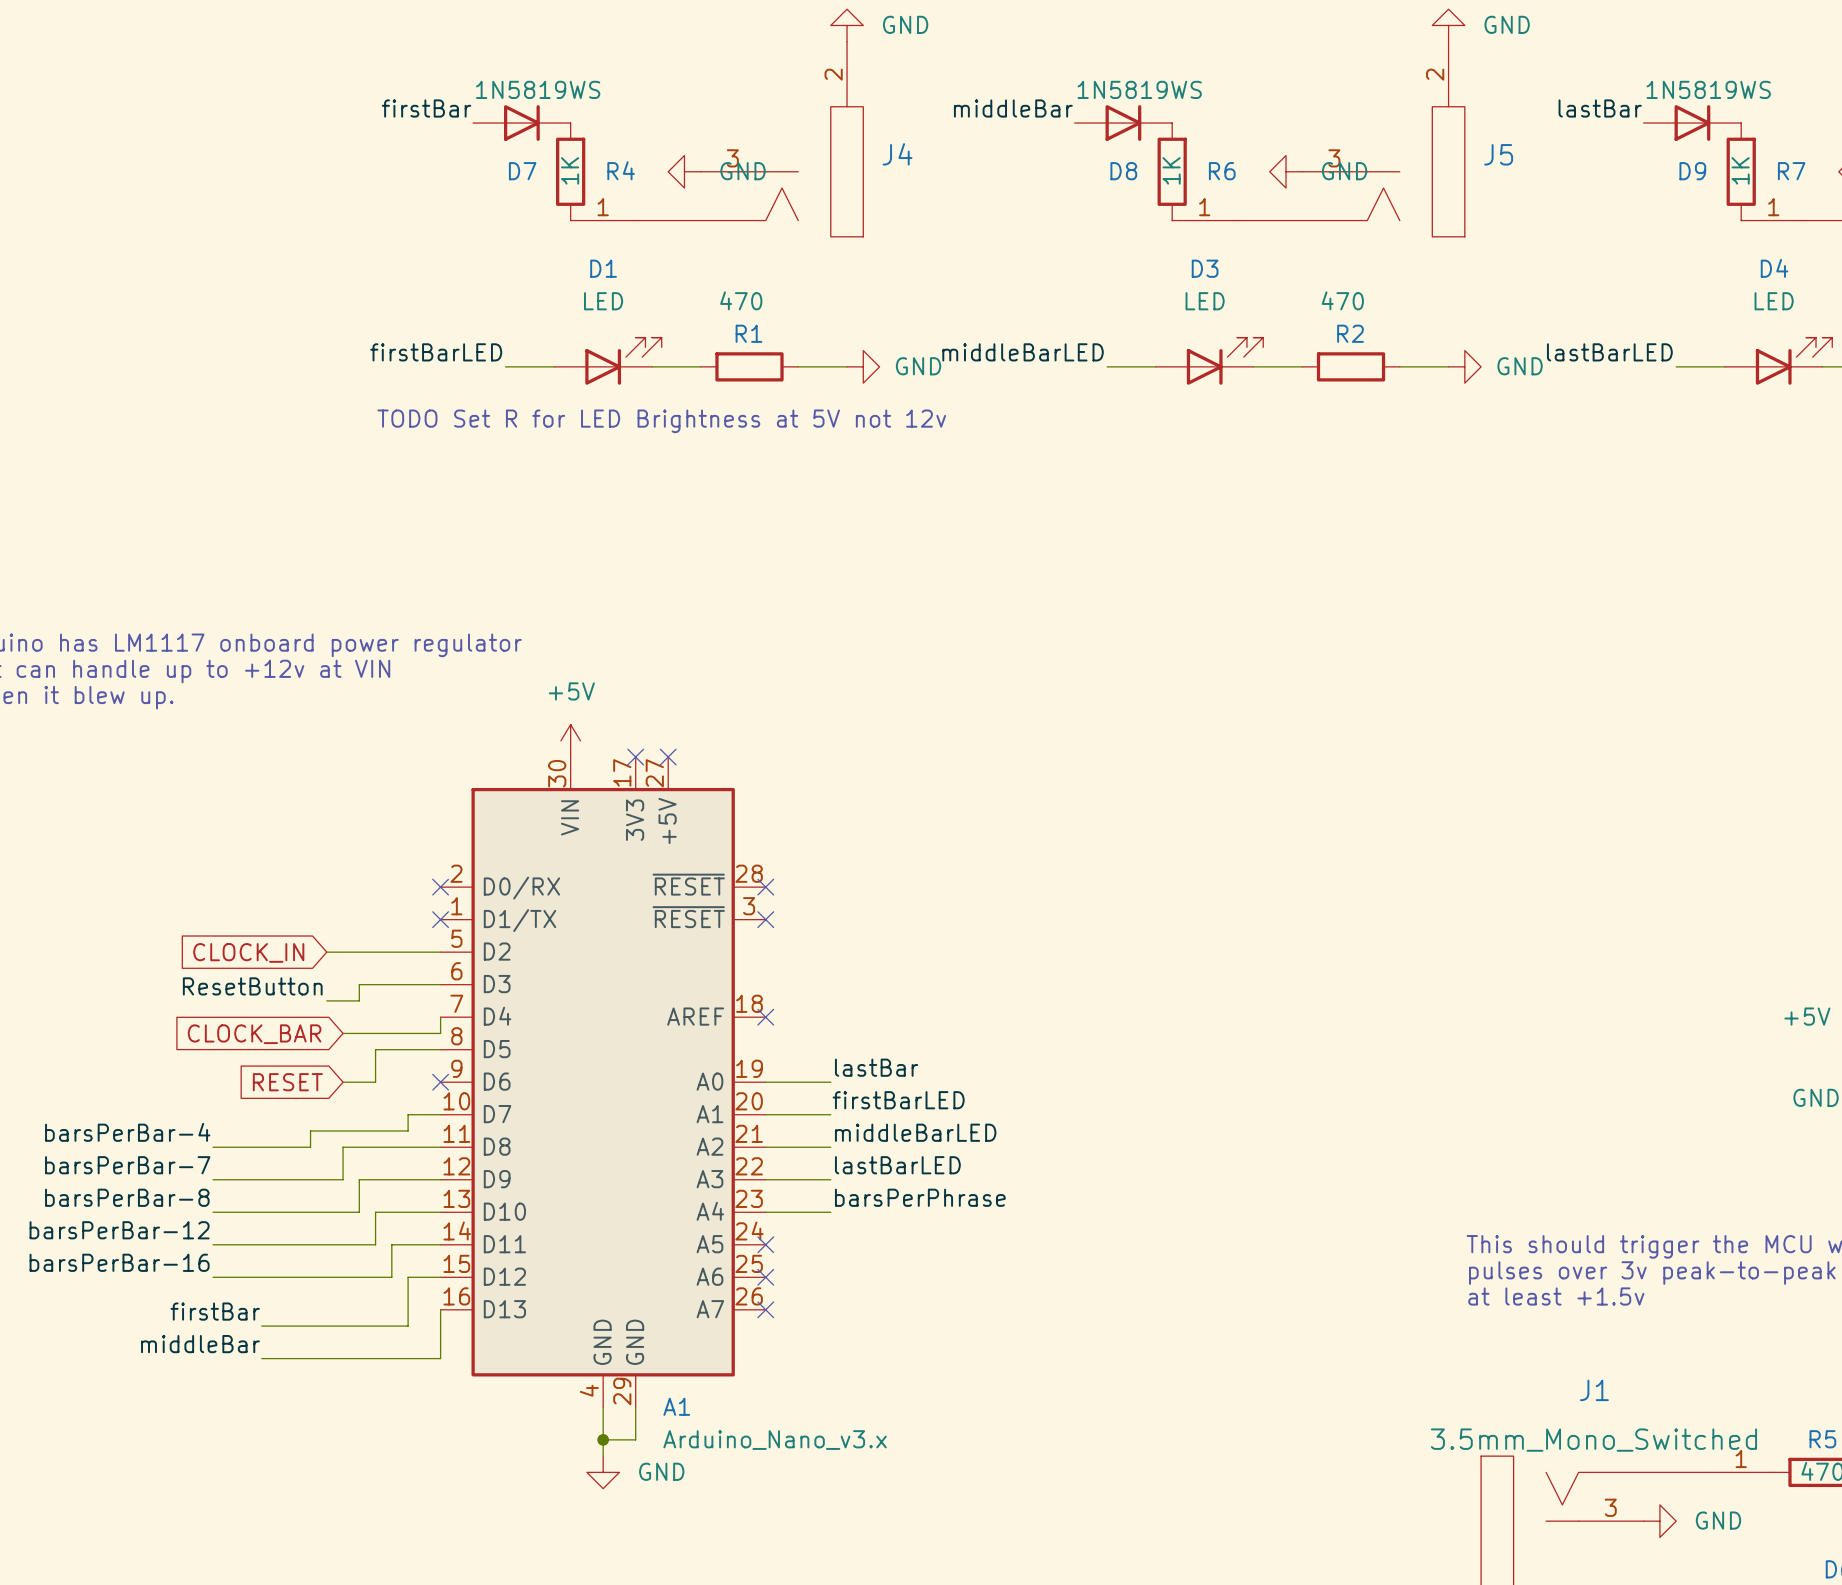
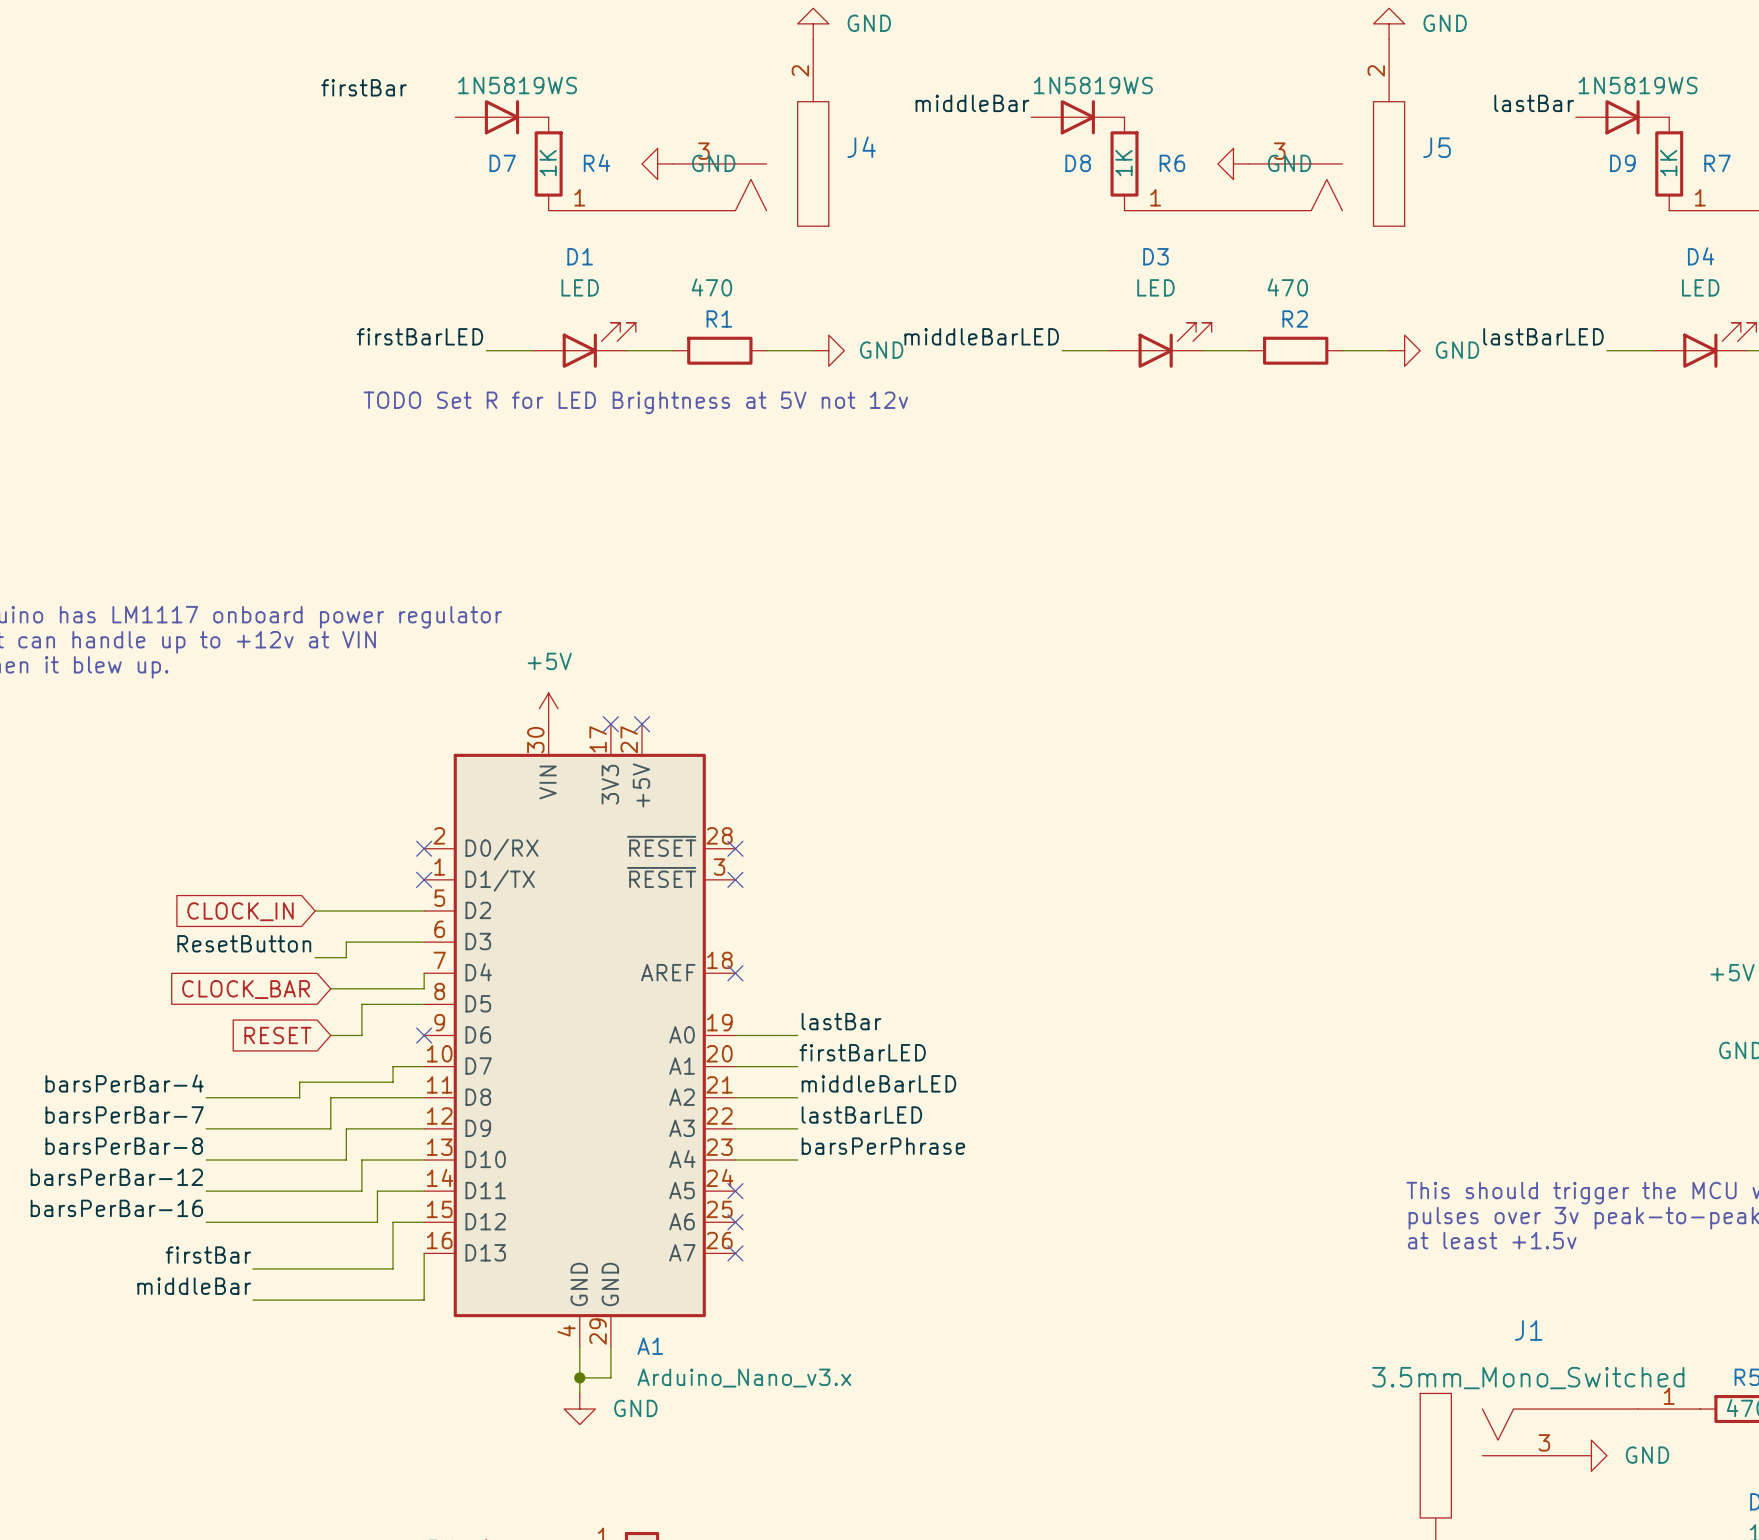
label position: firstBar (426, 108) -> firstBar (364, 87)

